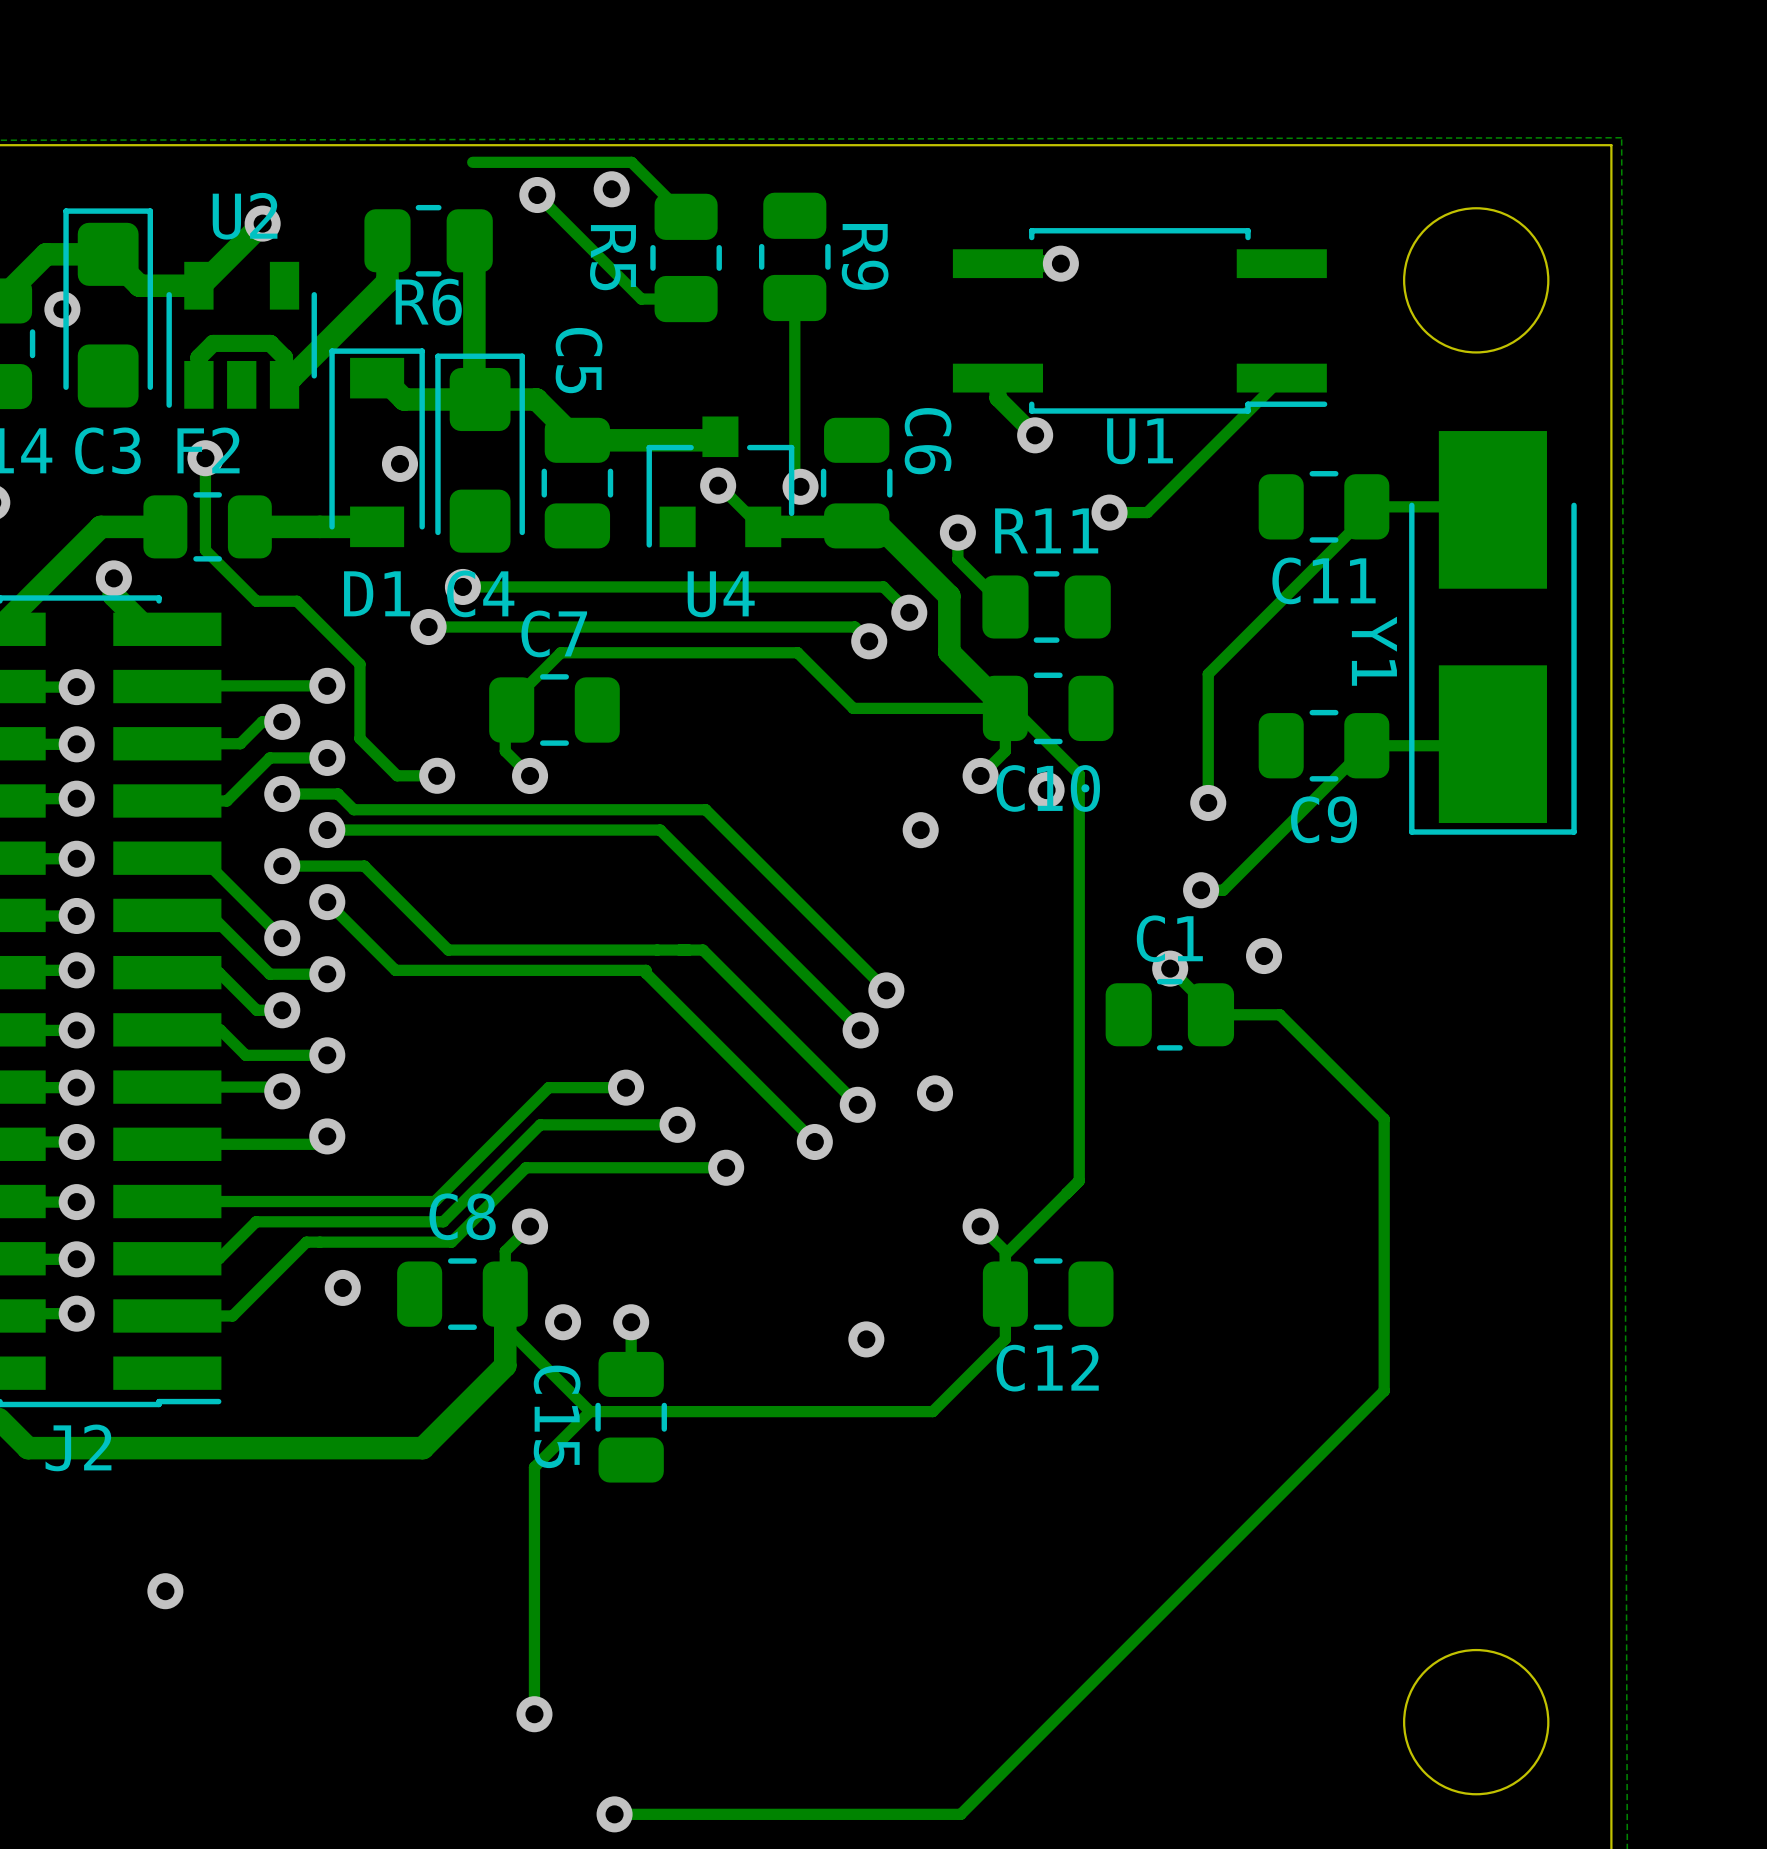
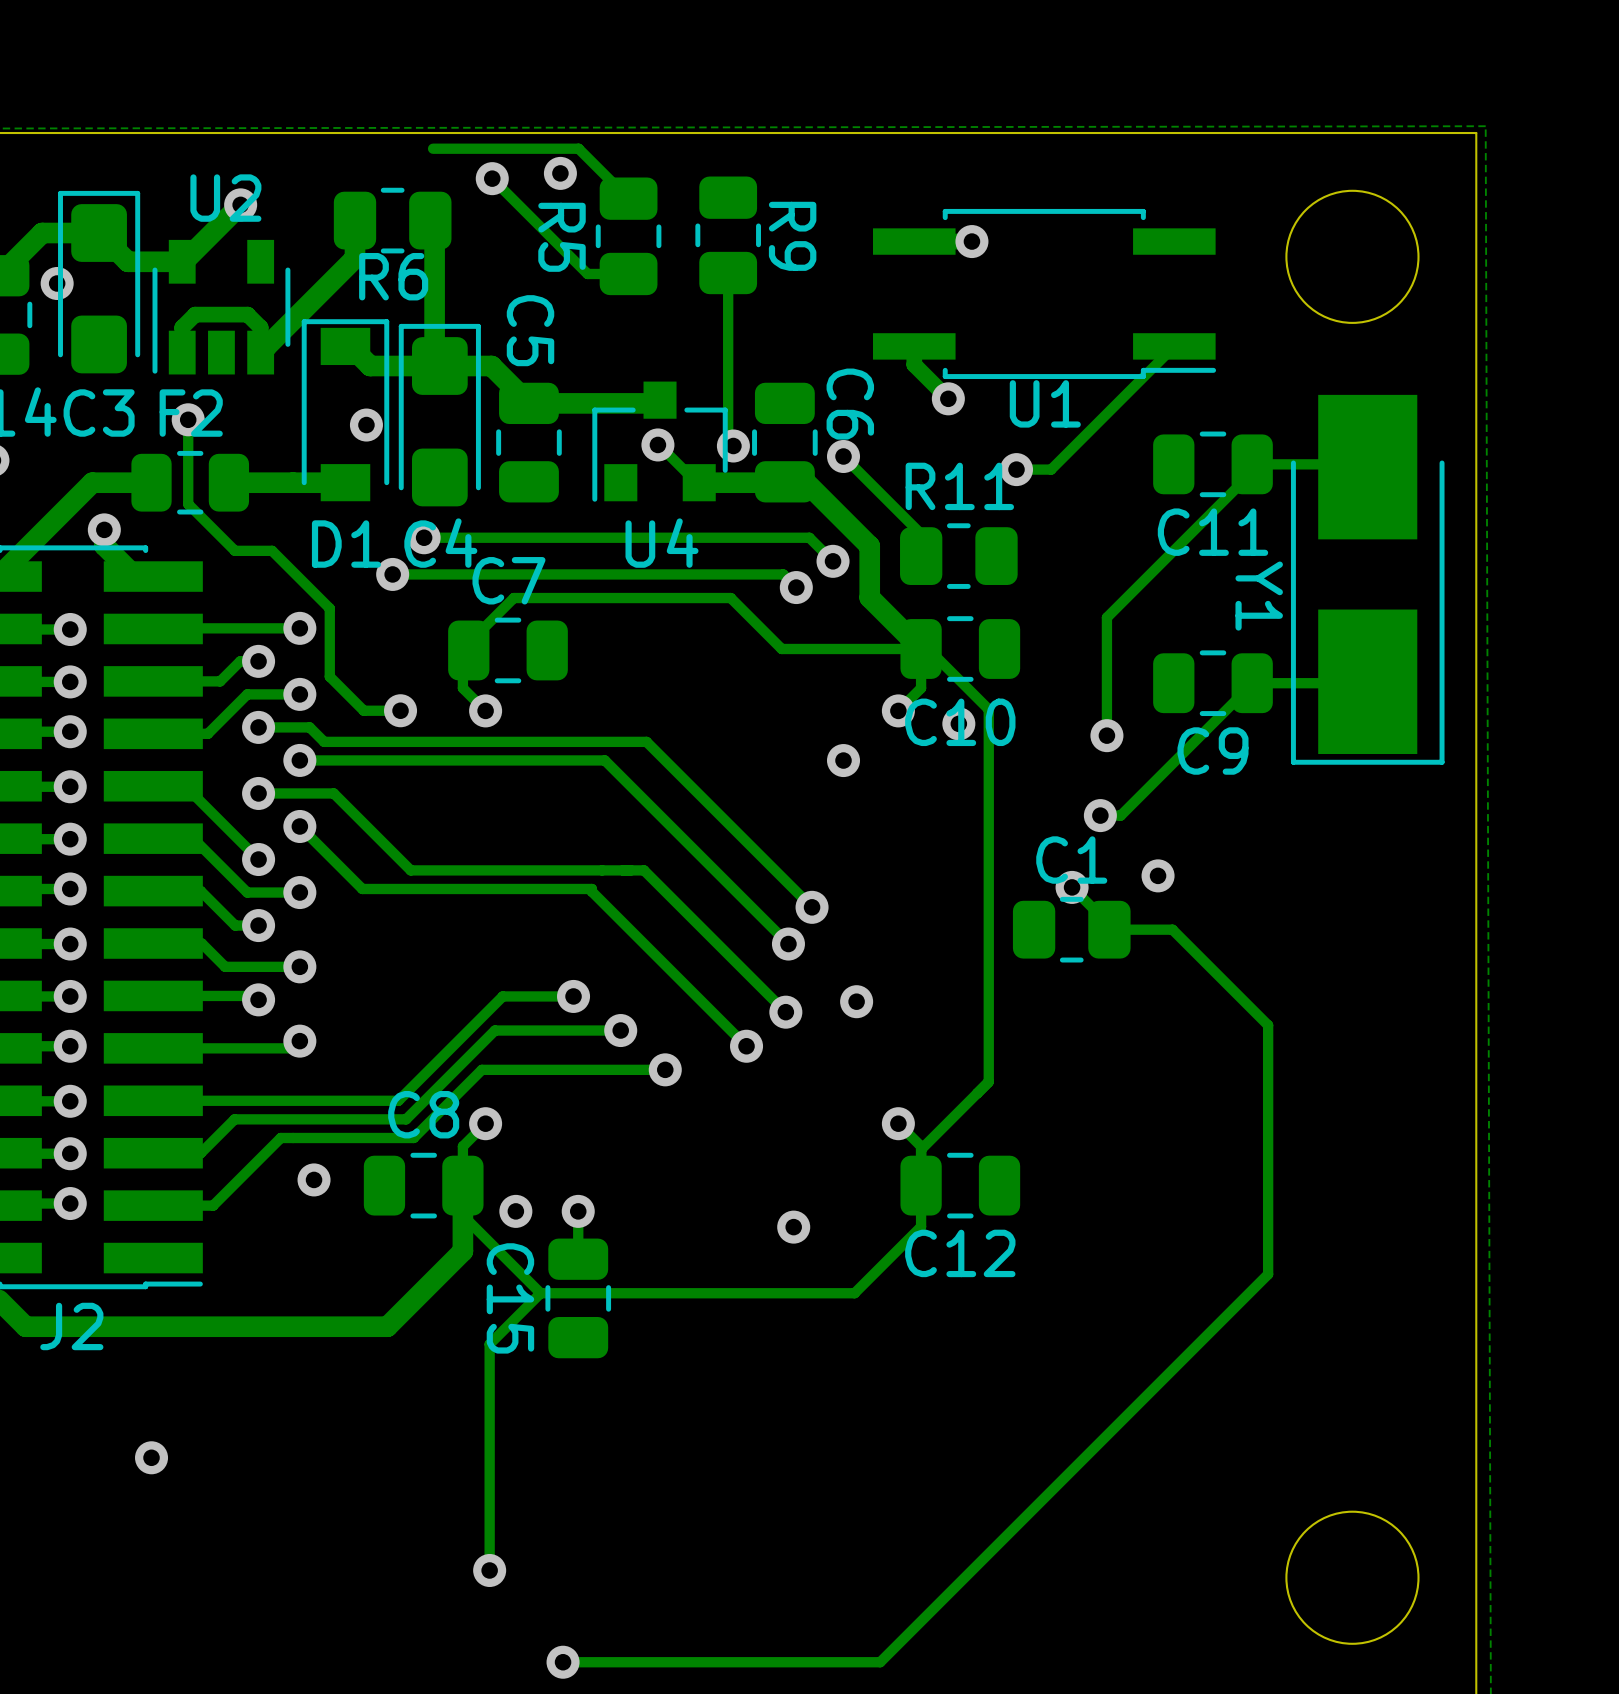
track: none -> (843, 456) (921, 534)
track: (957, 532) (957, 559) (1005, 606) -> none
via position: (957, 532) -> (843, 456)

